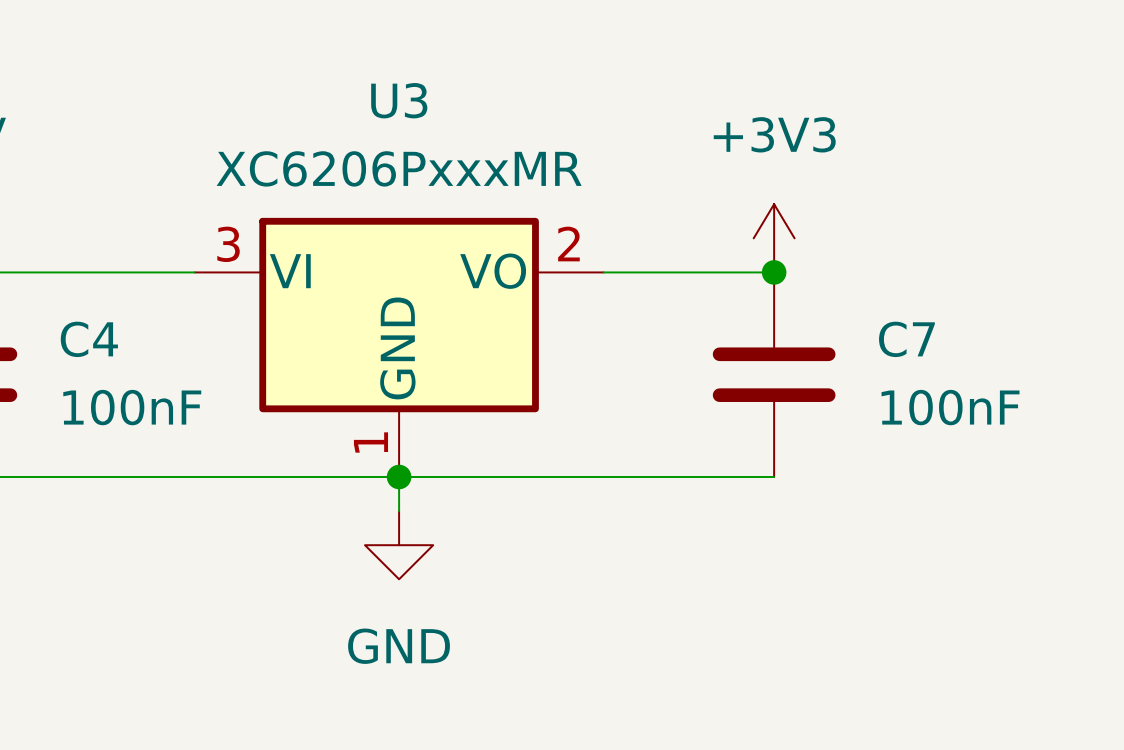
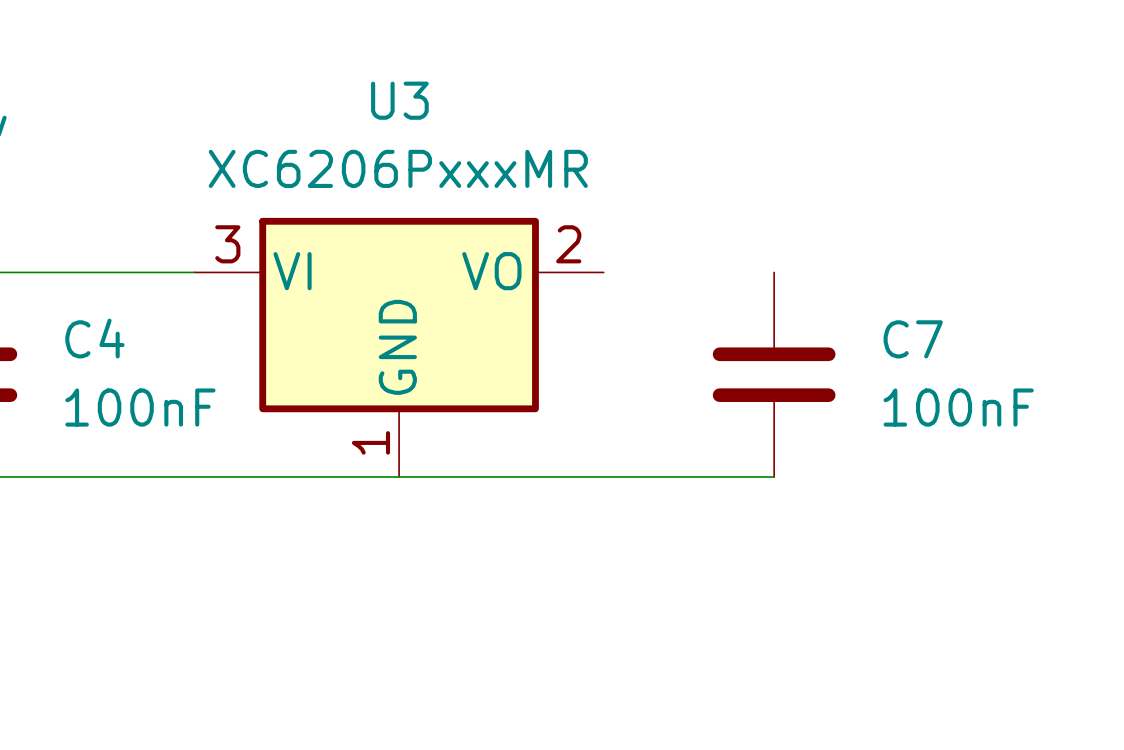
power symbol: +3V3 (774, 238) -> none
wire: (603, 272) (774, 272) -> none
junction: (774, 272) -> none
wire: (399, 477) (399, 511) -> none
junction: (399, 477) -> none
power symbol: GND (399, 545) -> none

